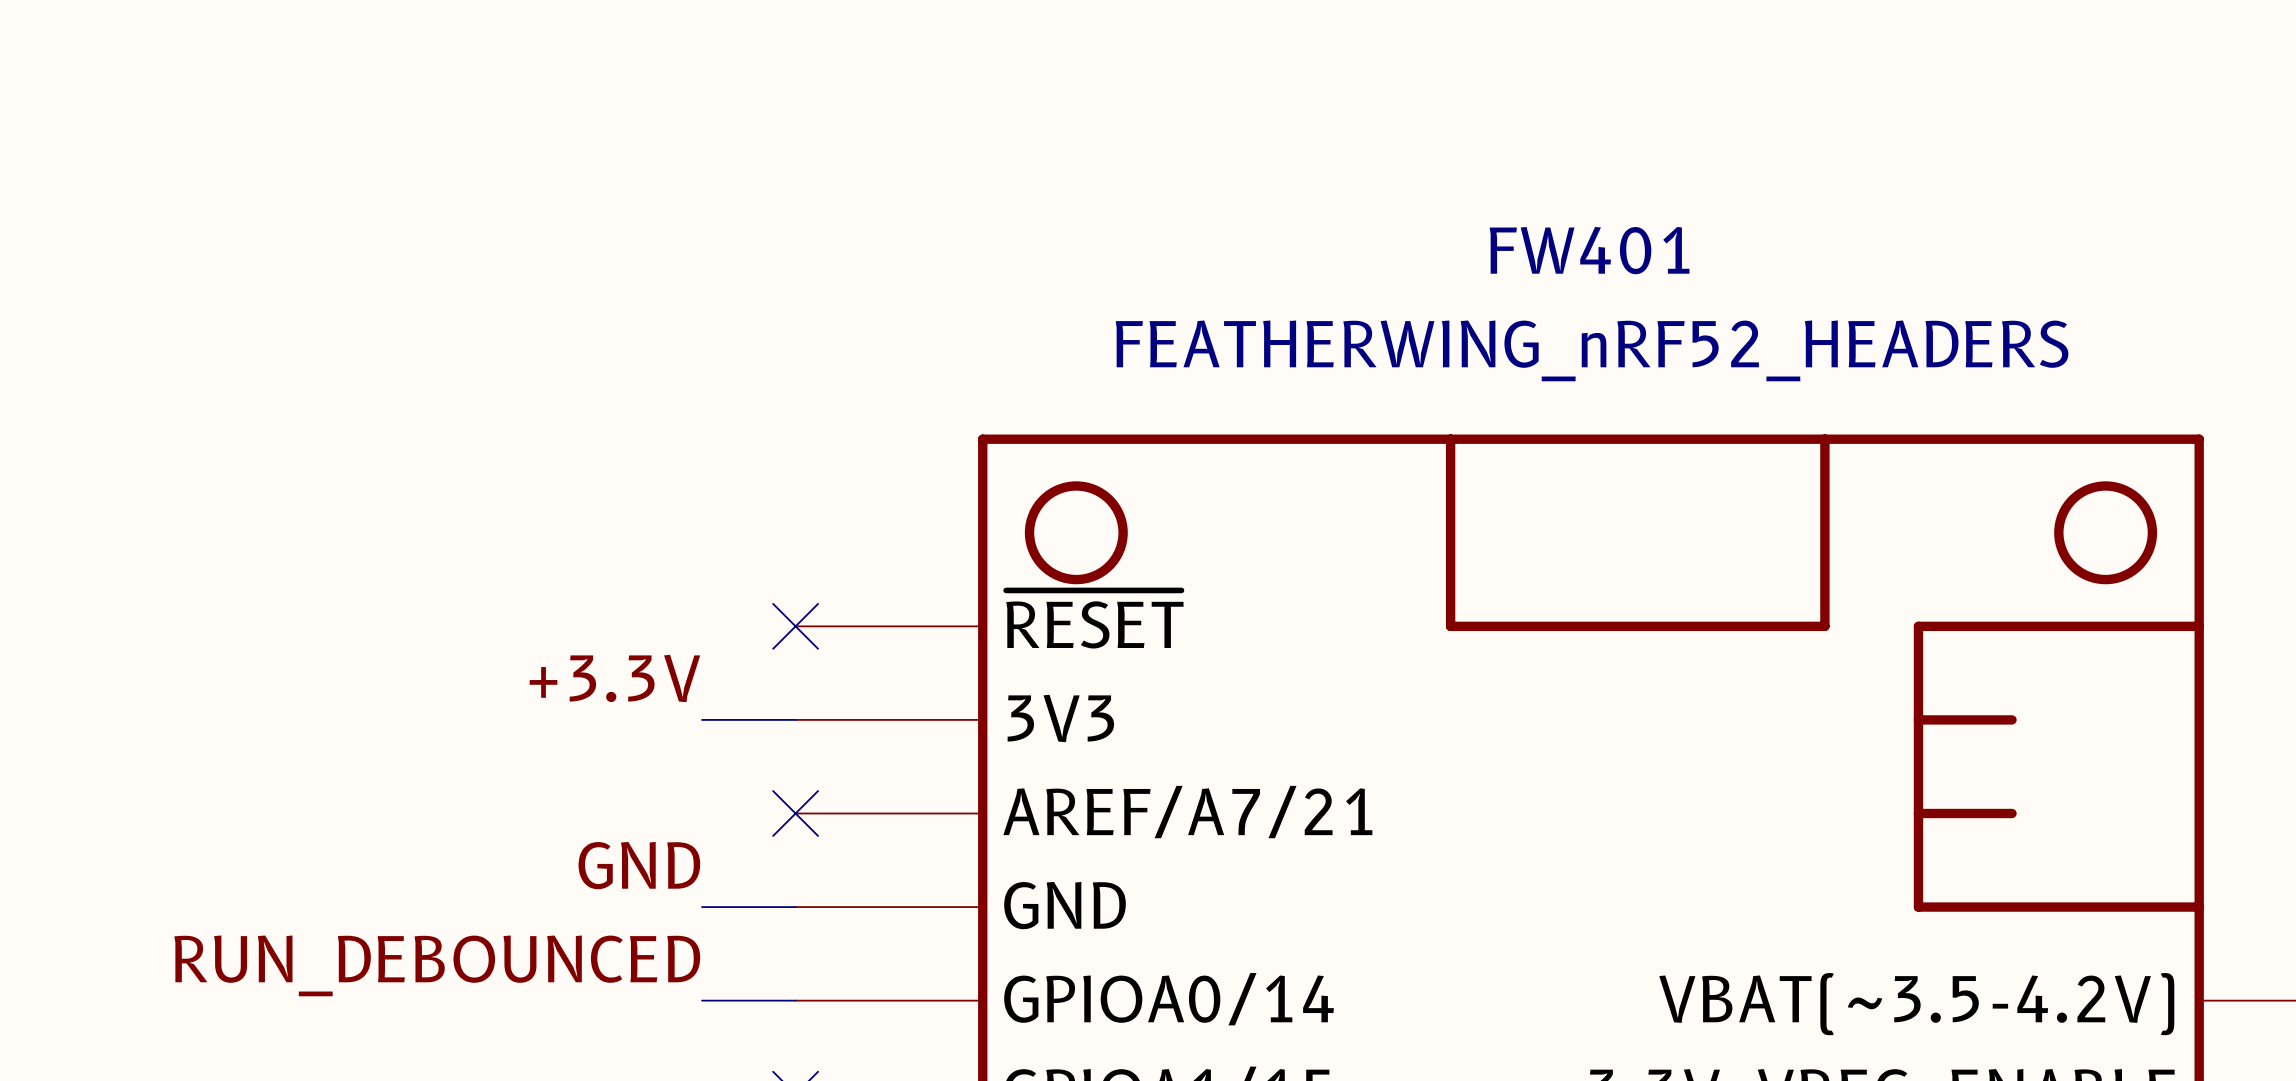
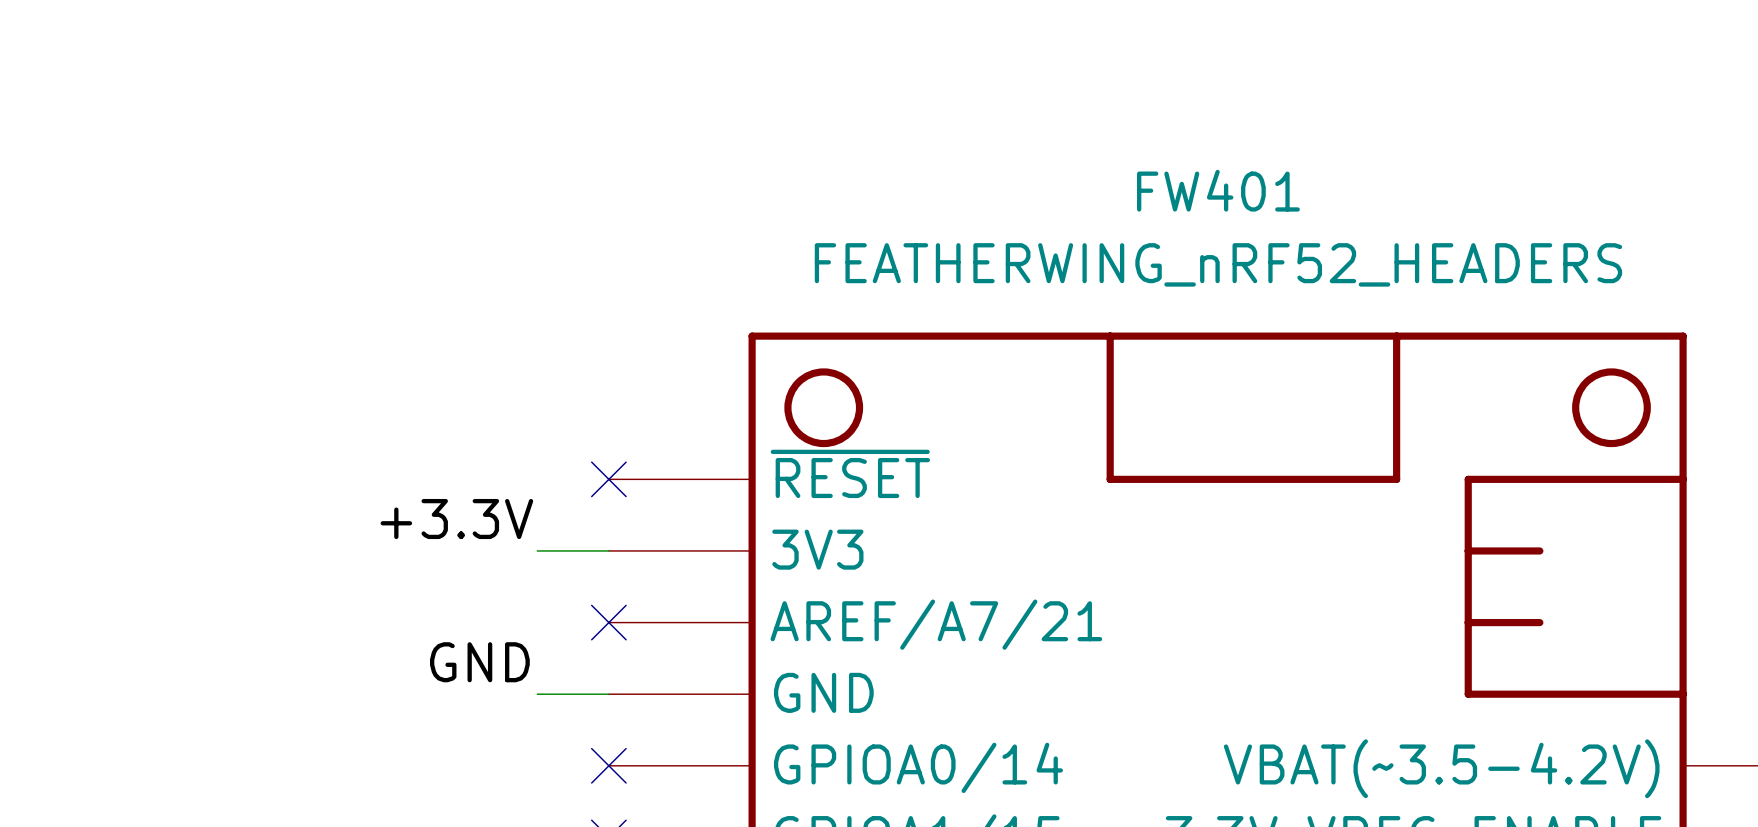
label: RUN_DEBOUNCED (437, 965) -> none
wire: (702, 1000) (795, 1000) -> none
no-connect mark: none -> (608, 765)

